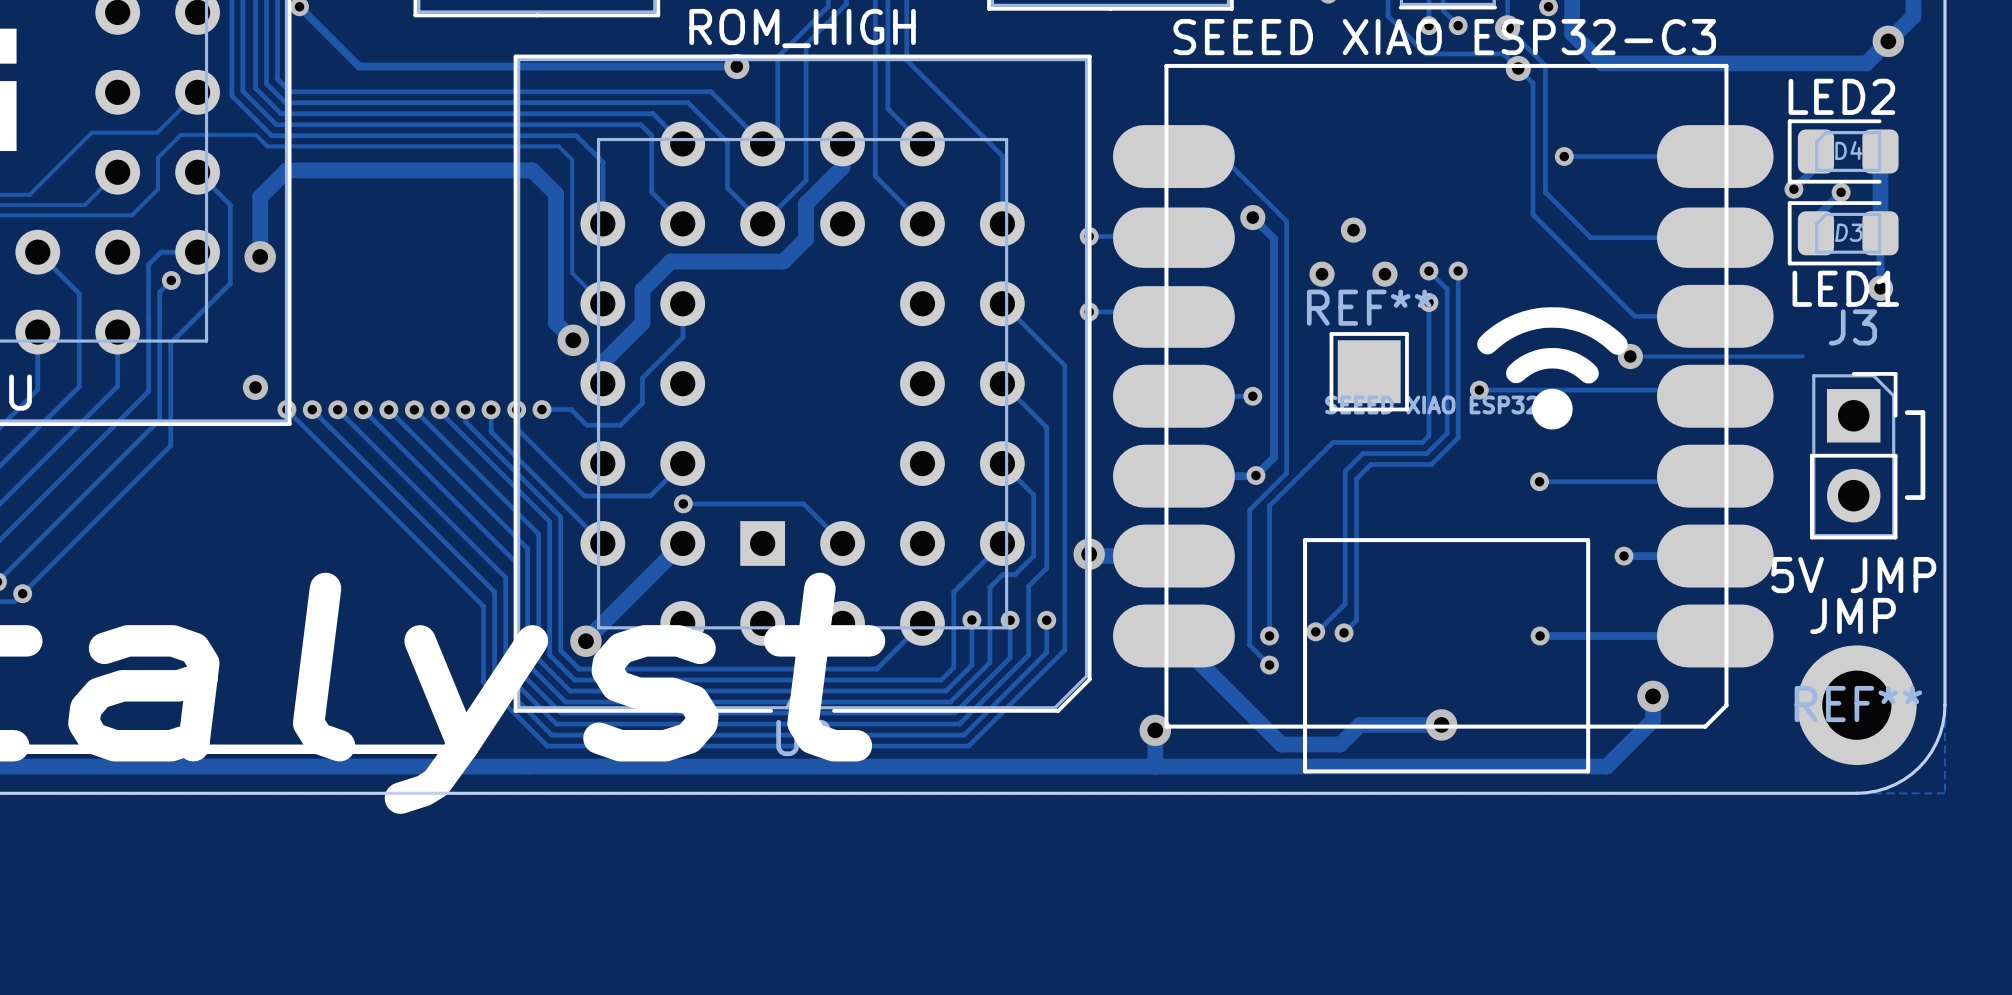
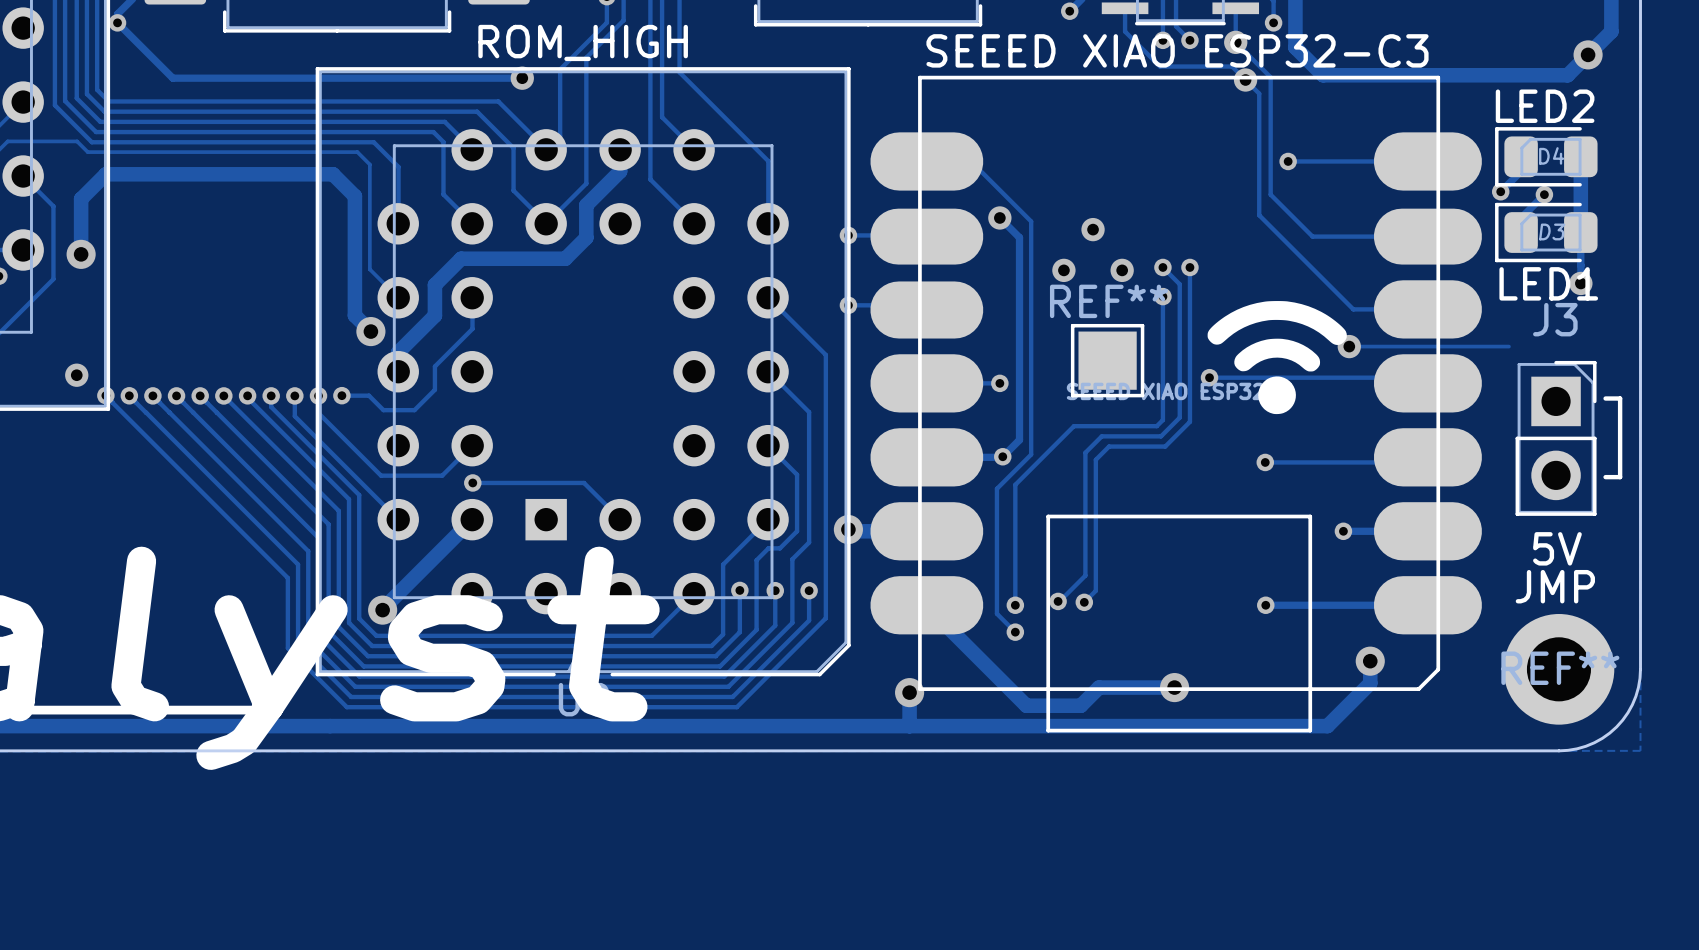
J3 value: 5V JMP (1853, 575) -> 5V (1557, 548)

